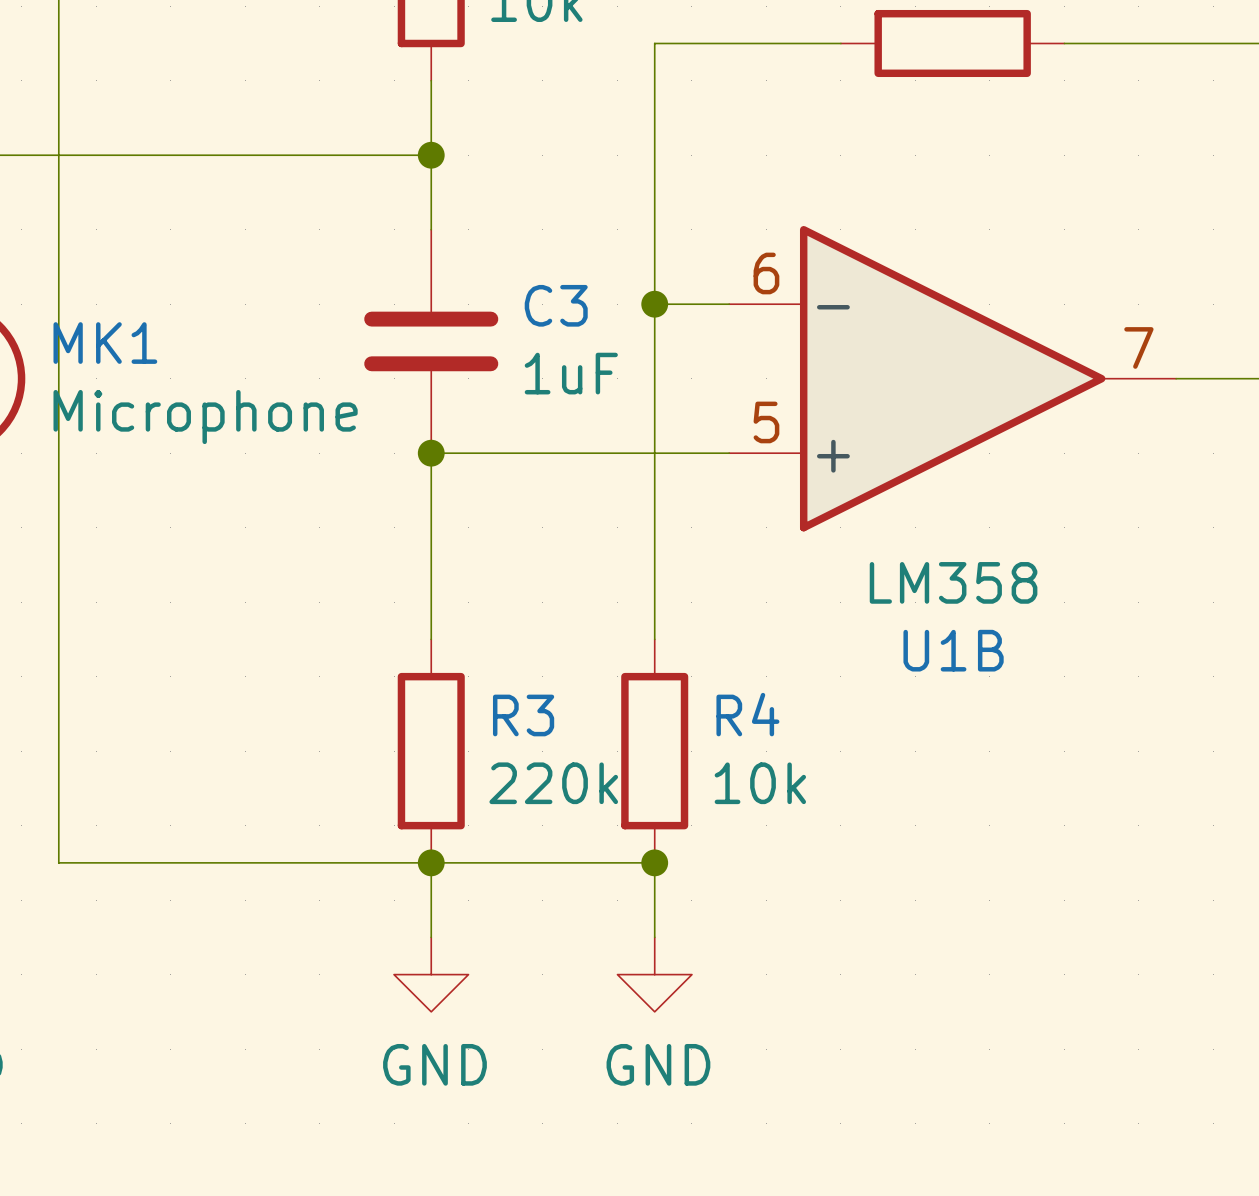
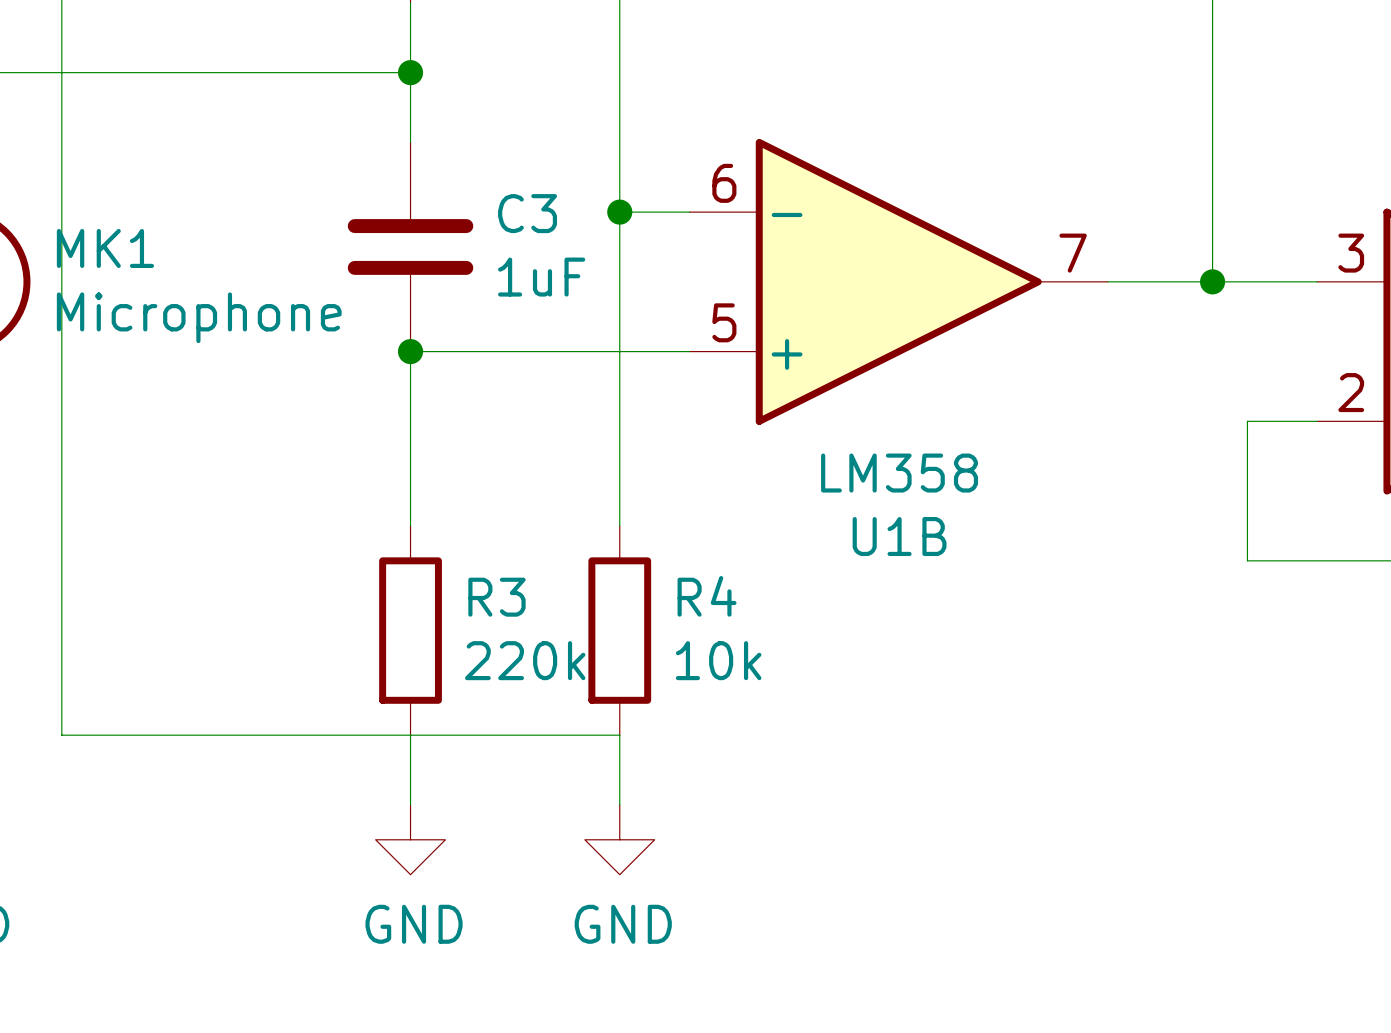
junction: (431, 862) -> none
junction: (654, 862) -> none

